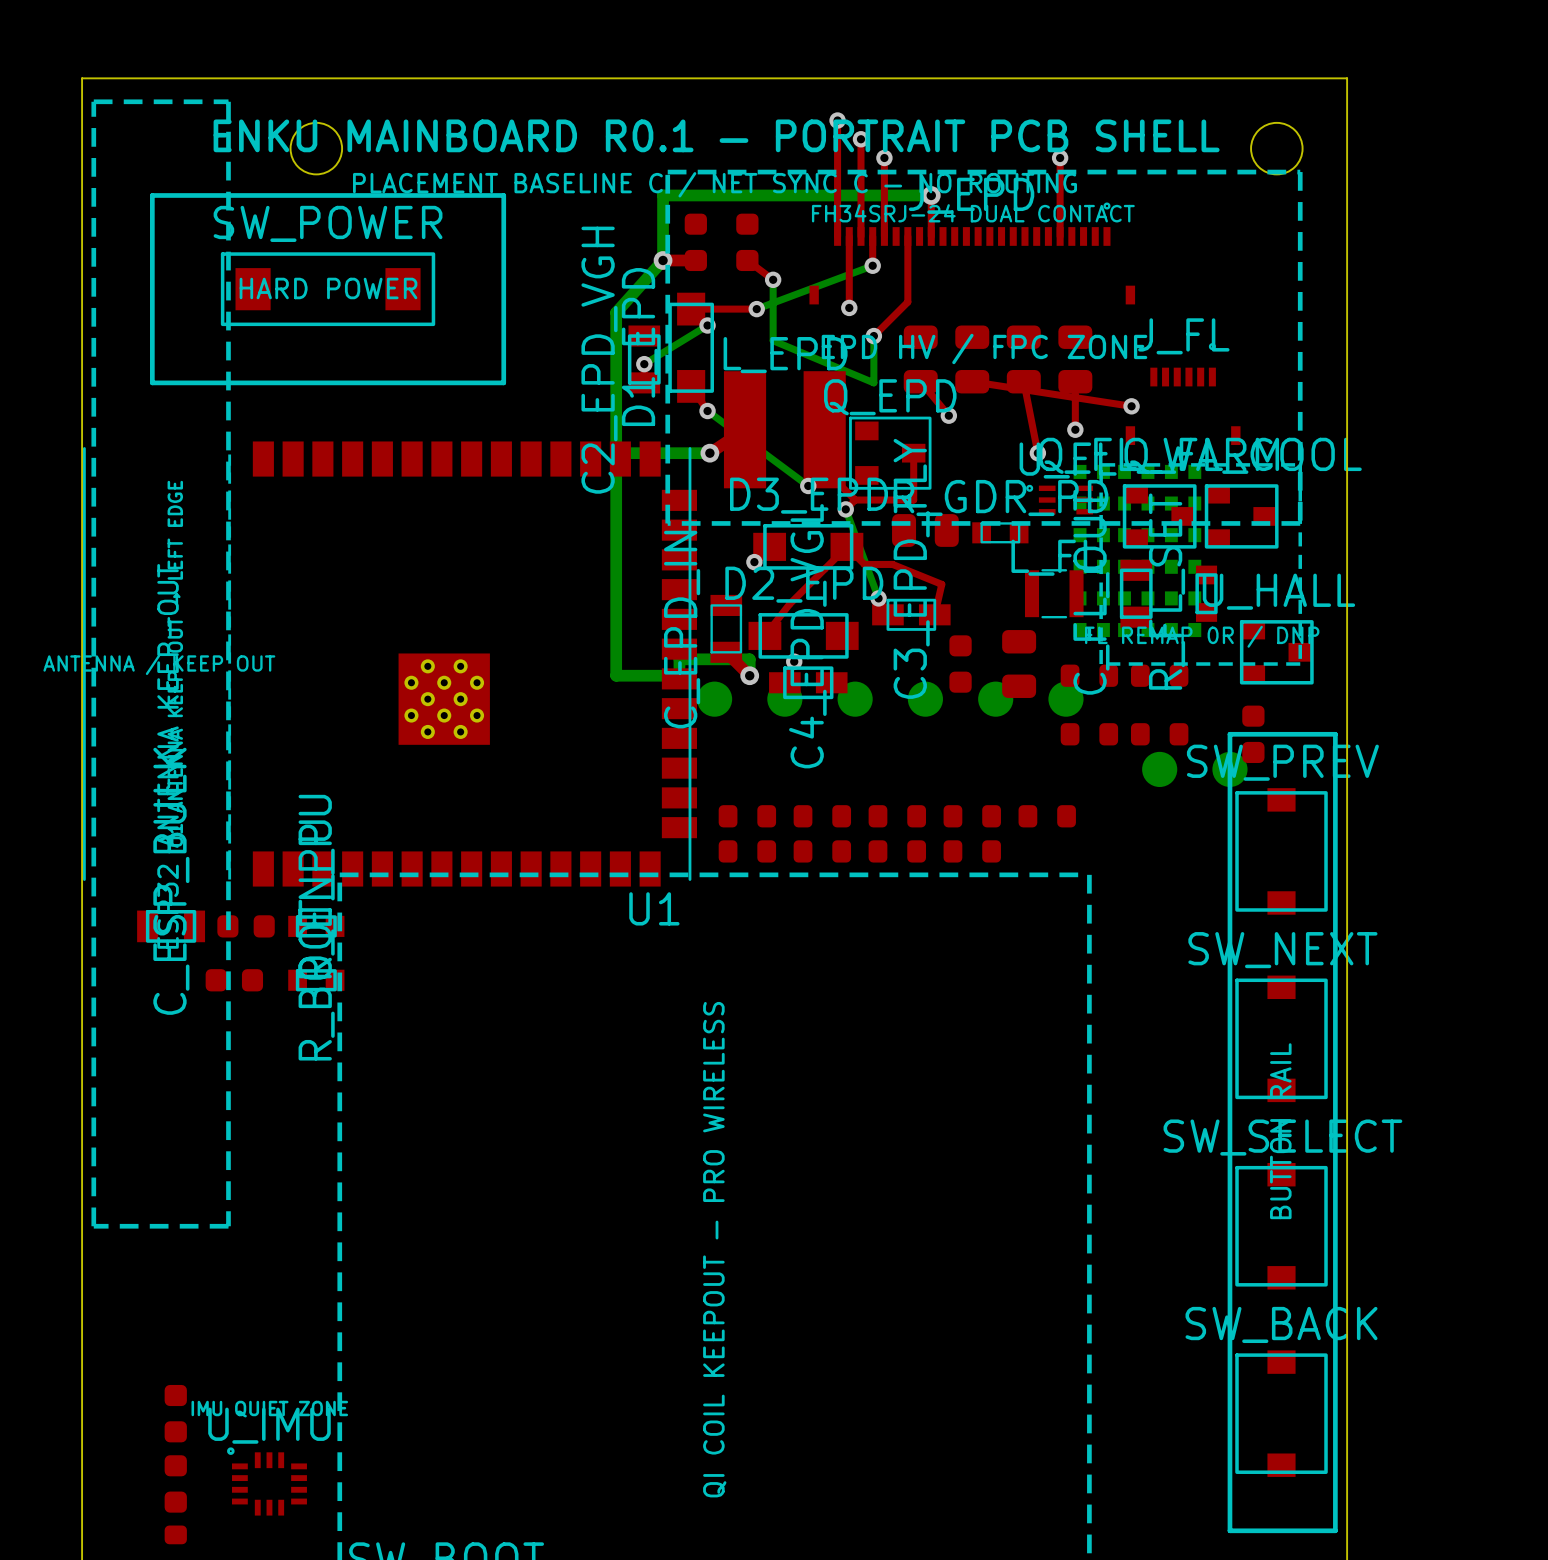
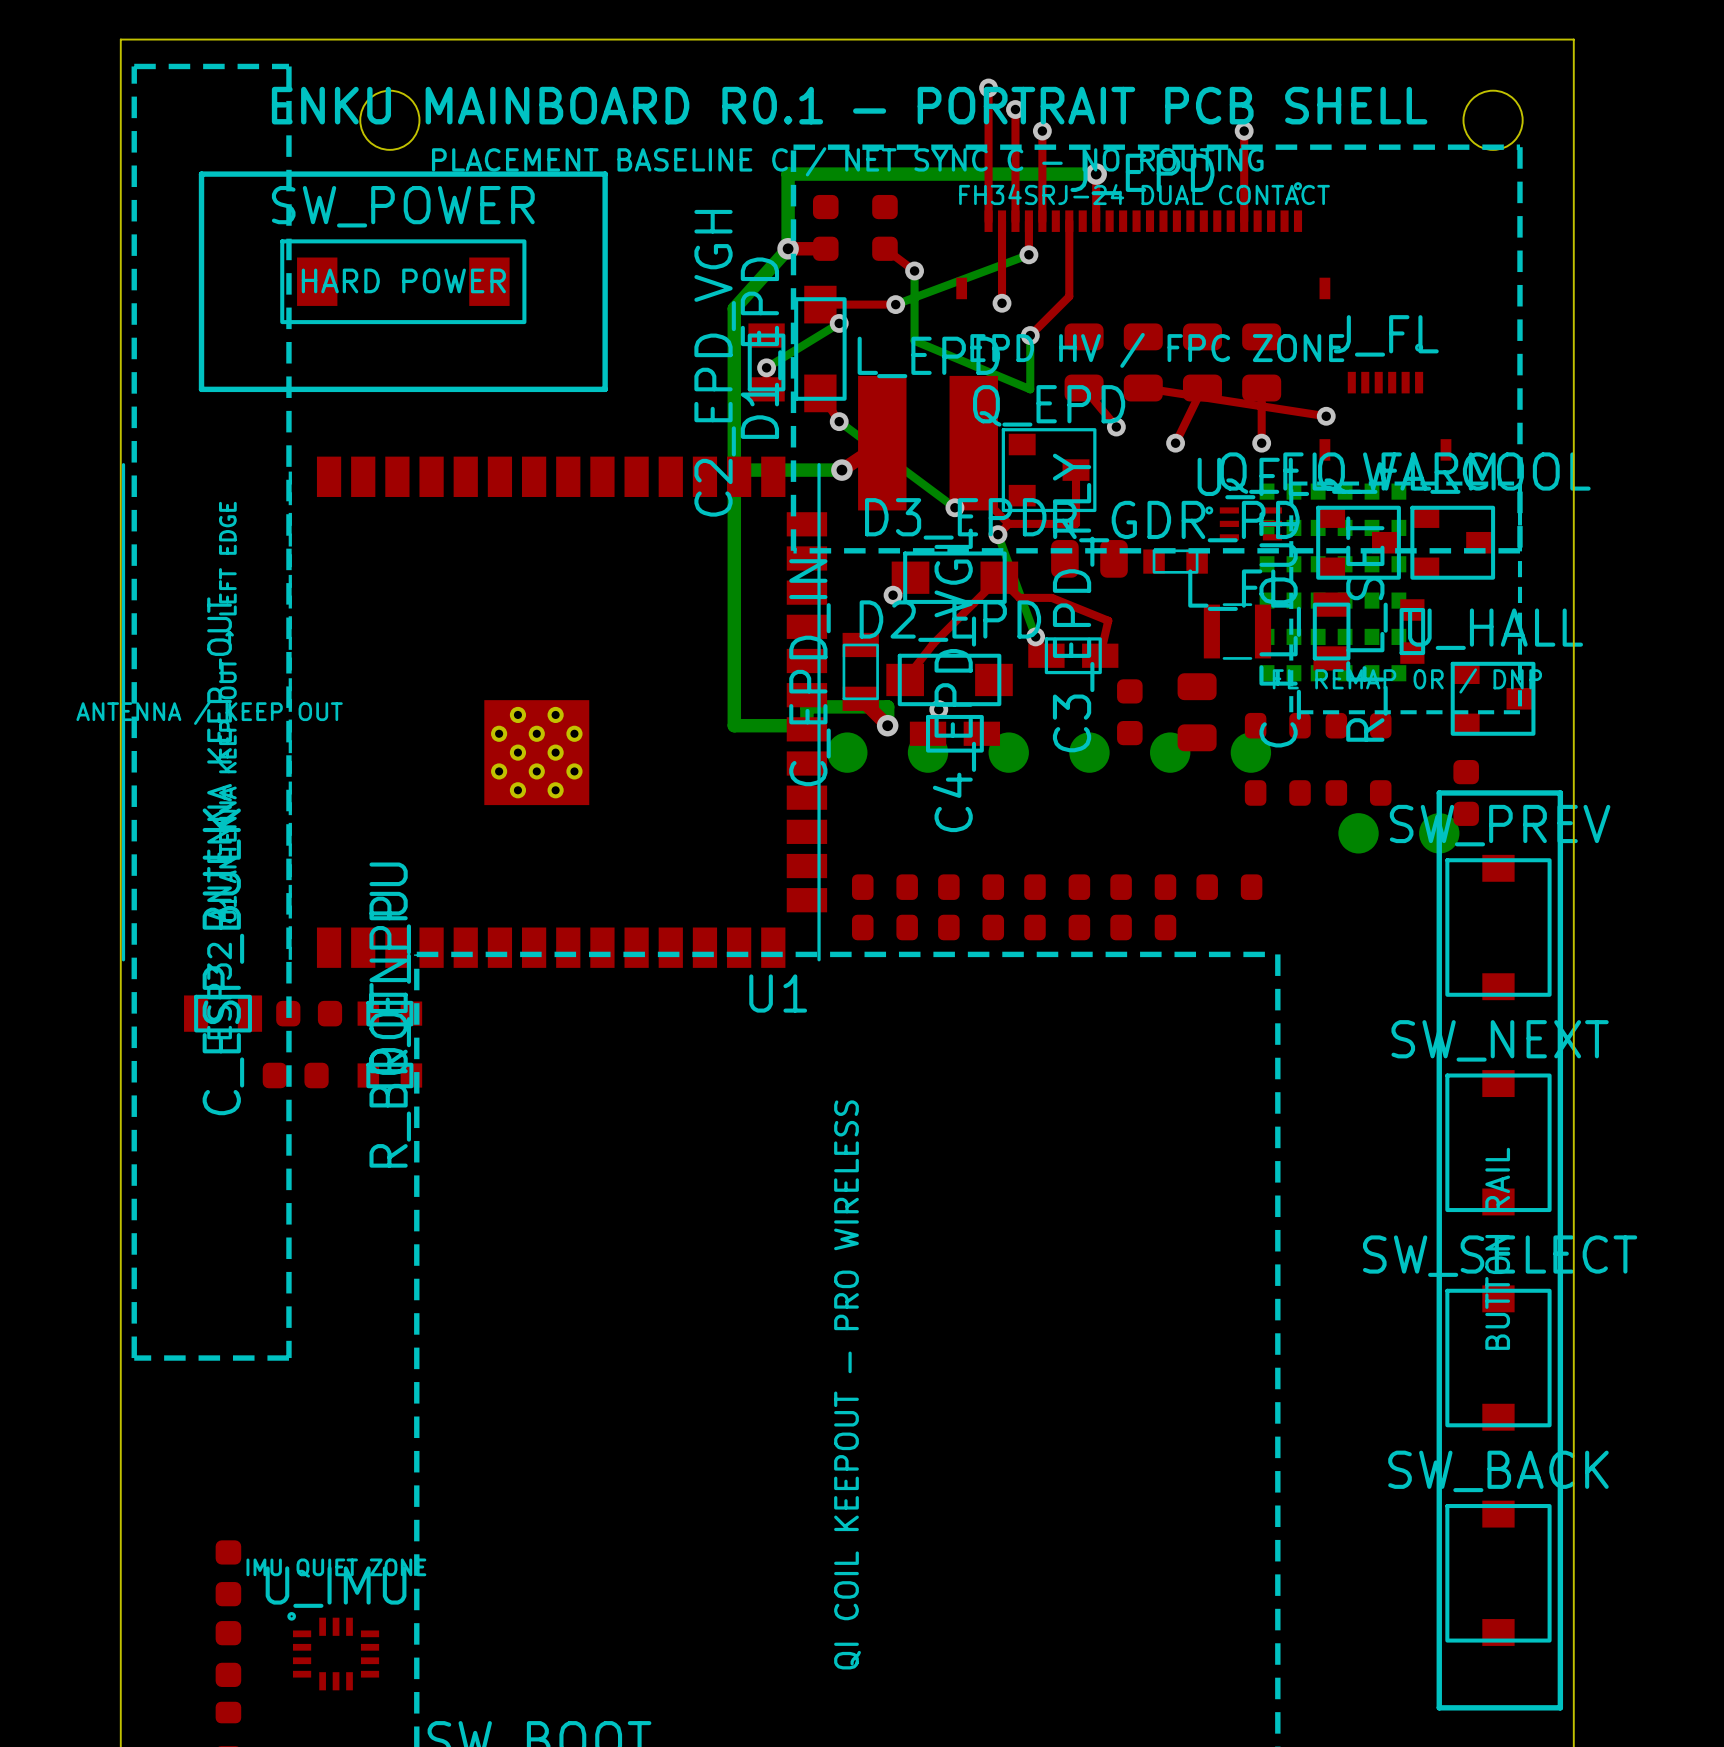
top track: (1023, 381) (1037, 453) -> (1202, 388) (1175, 443)
via position: (1037, 453) -> (1175, 443)

